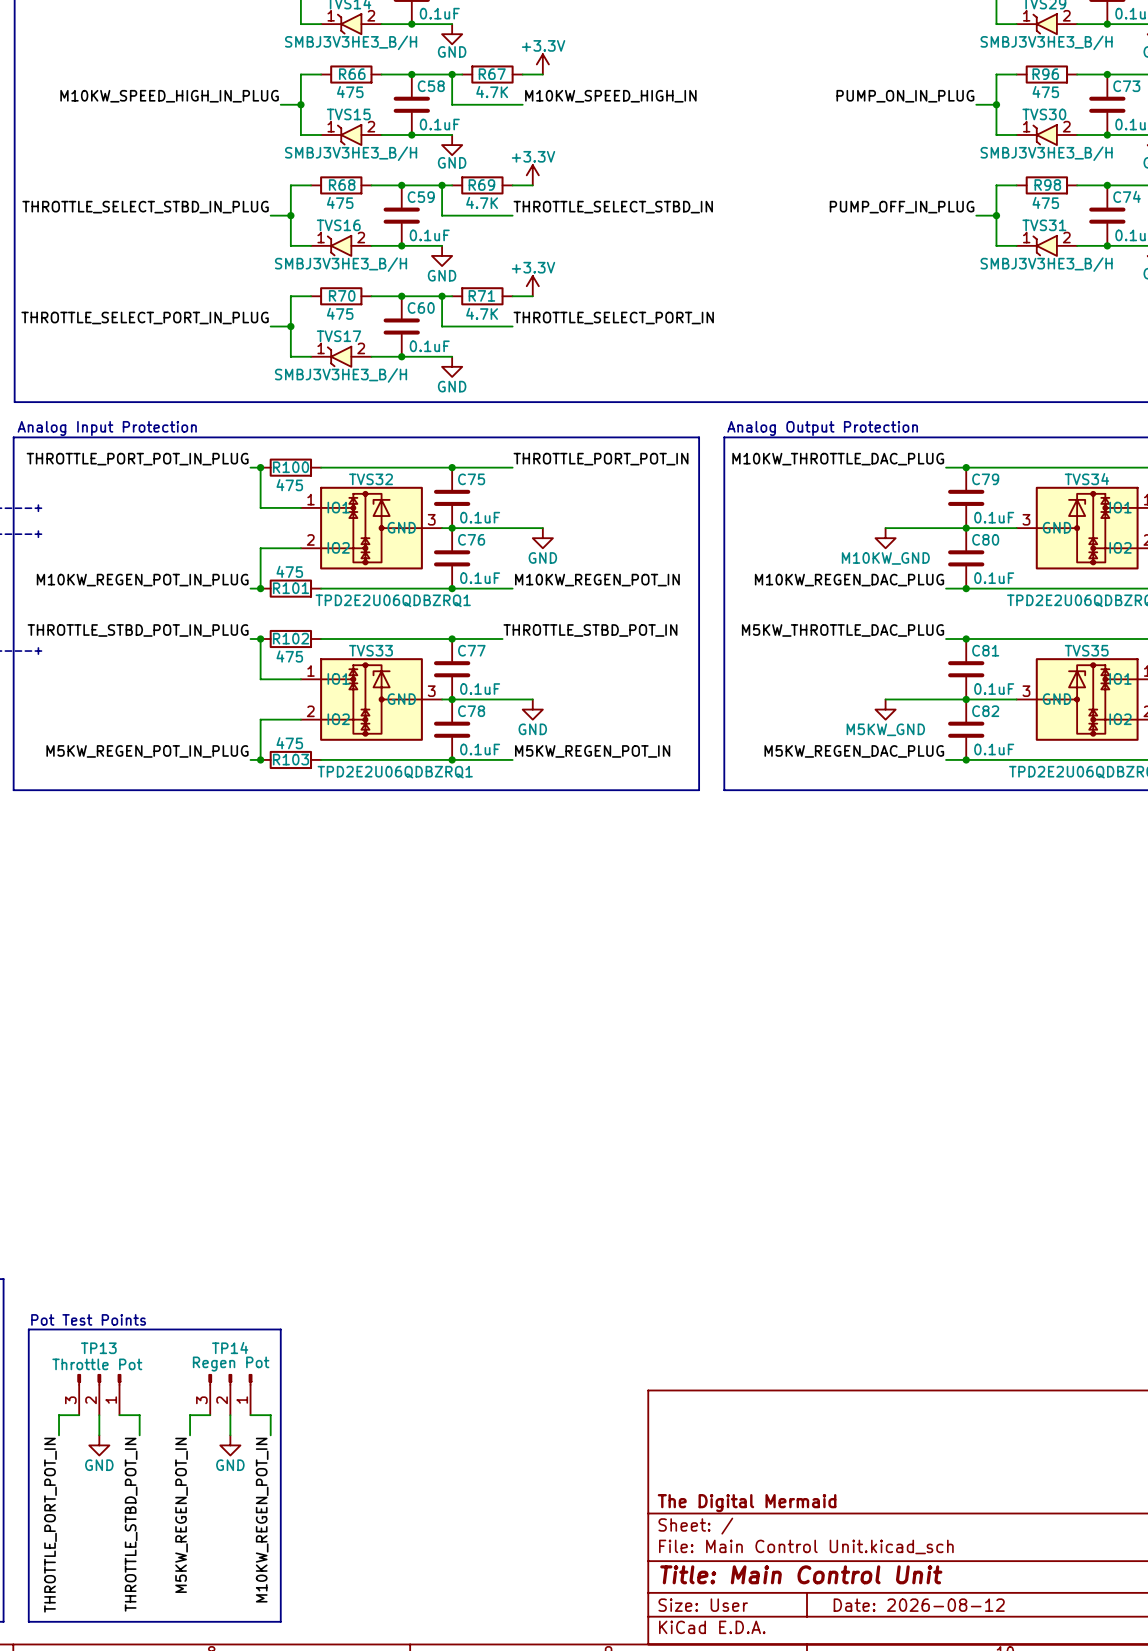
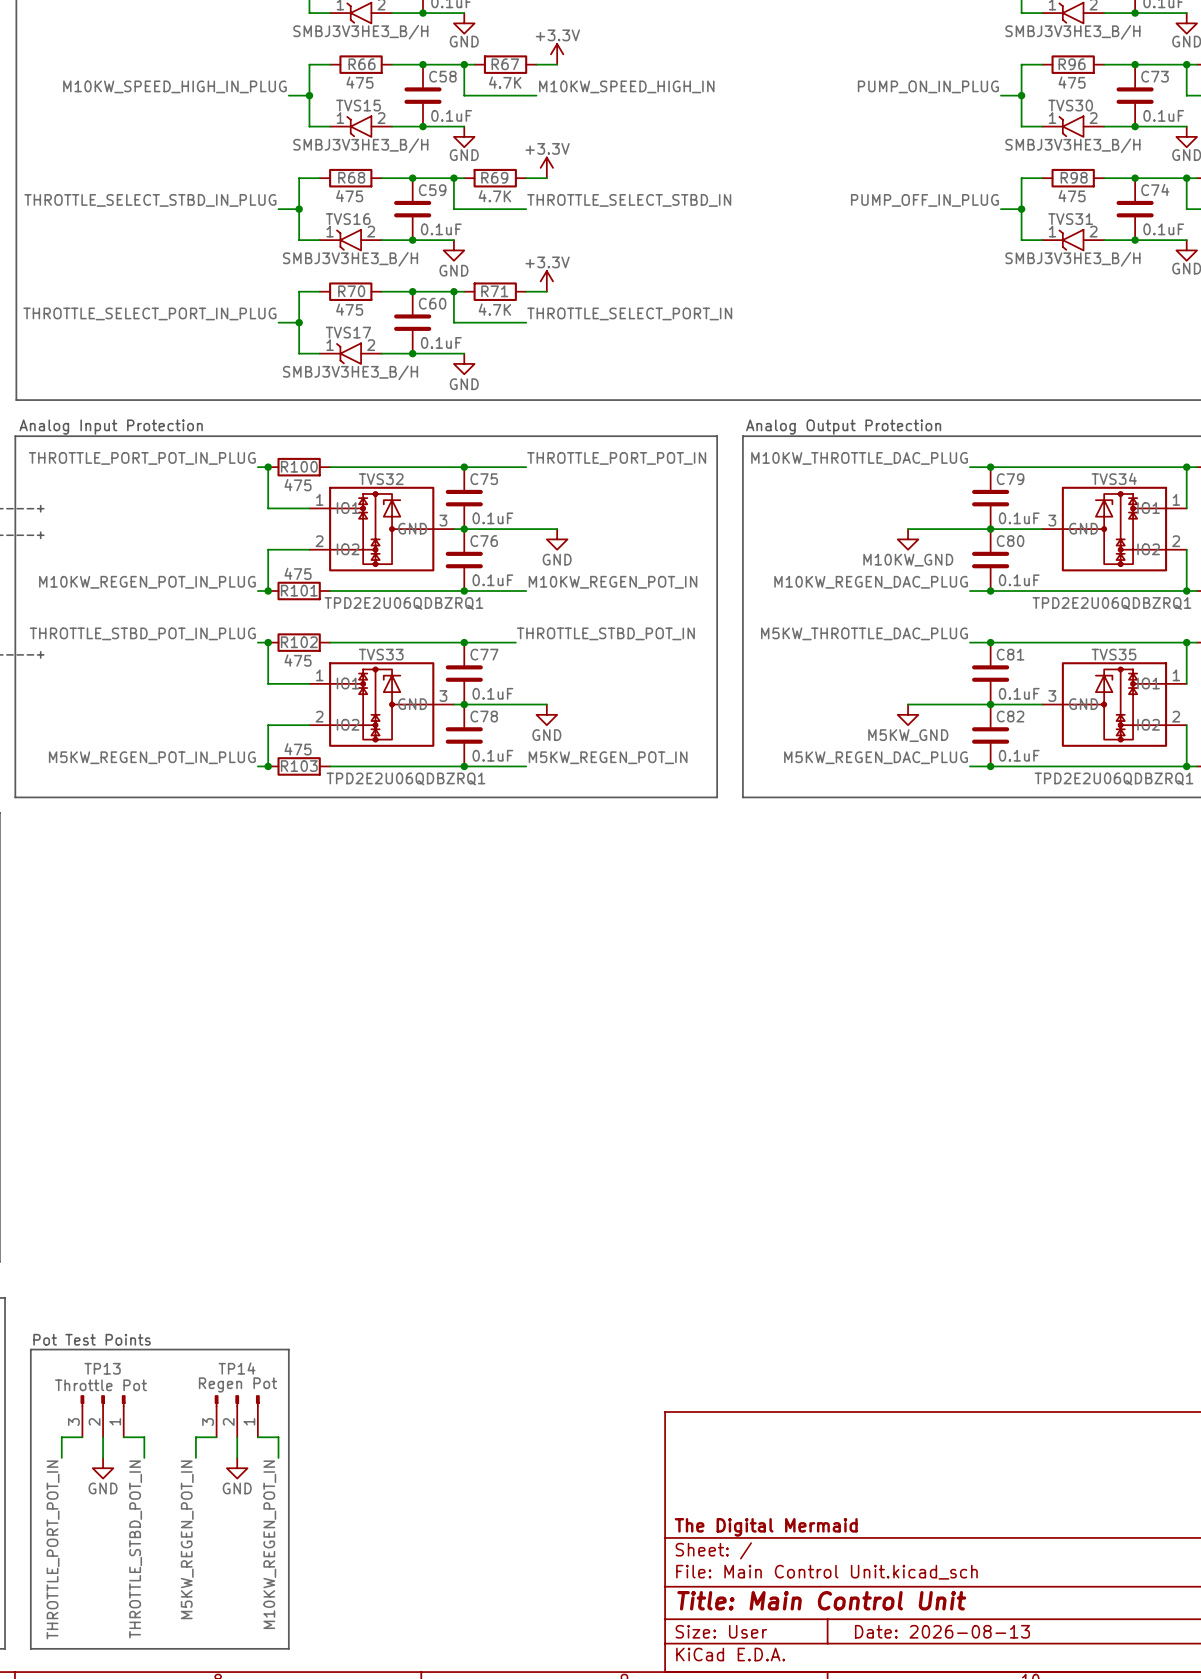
title block: Date: 2026-08-12 (919, 1605) -> Date: 2026-08-13 (942, 1631)

